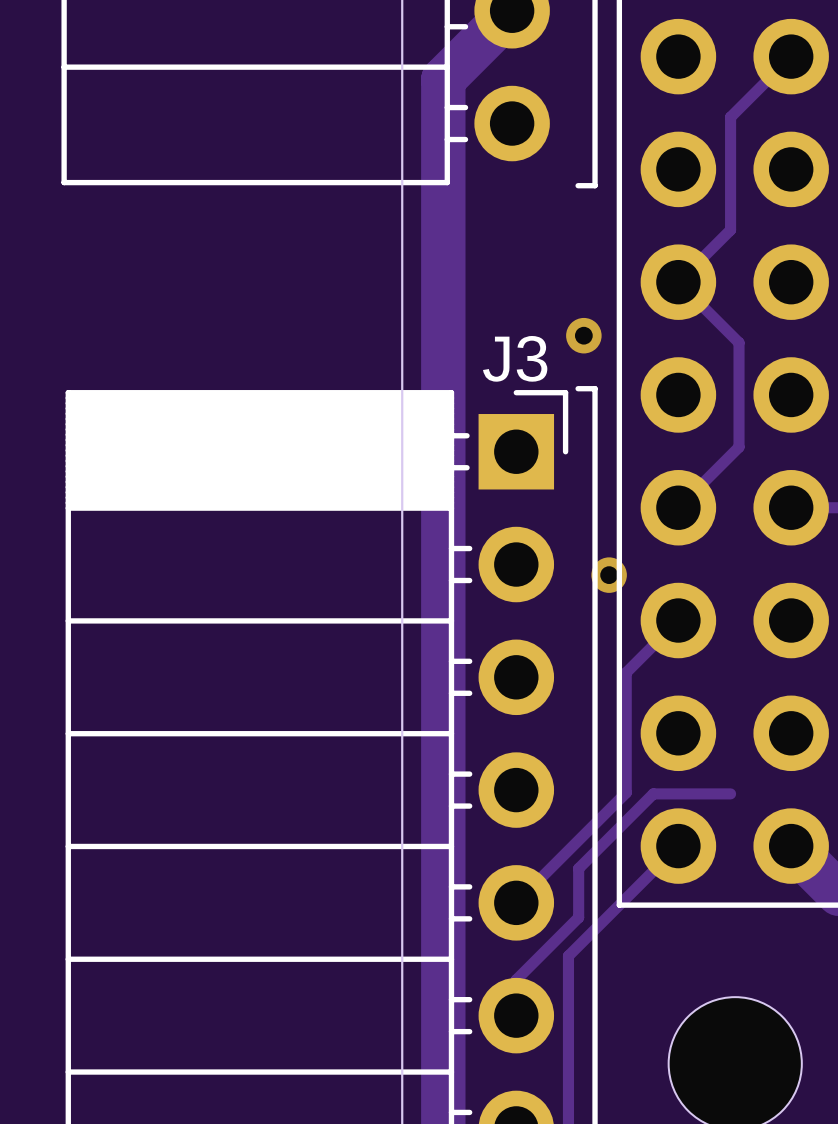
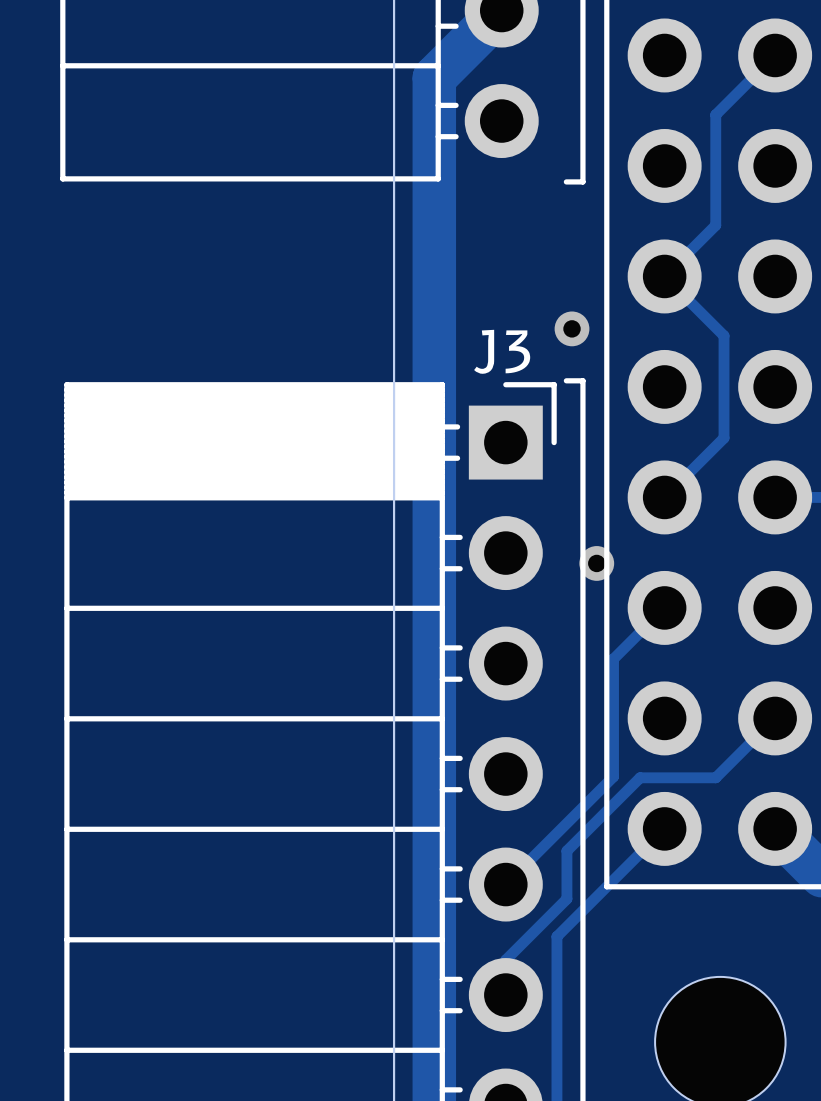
track: none -> (775, 718) (715, 777)

